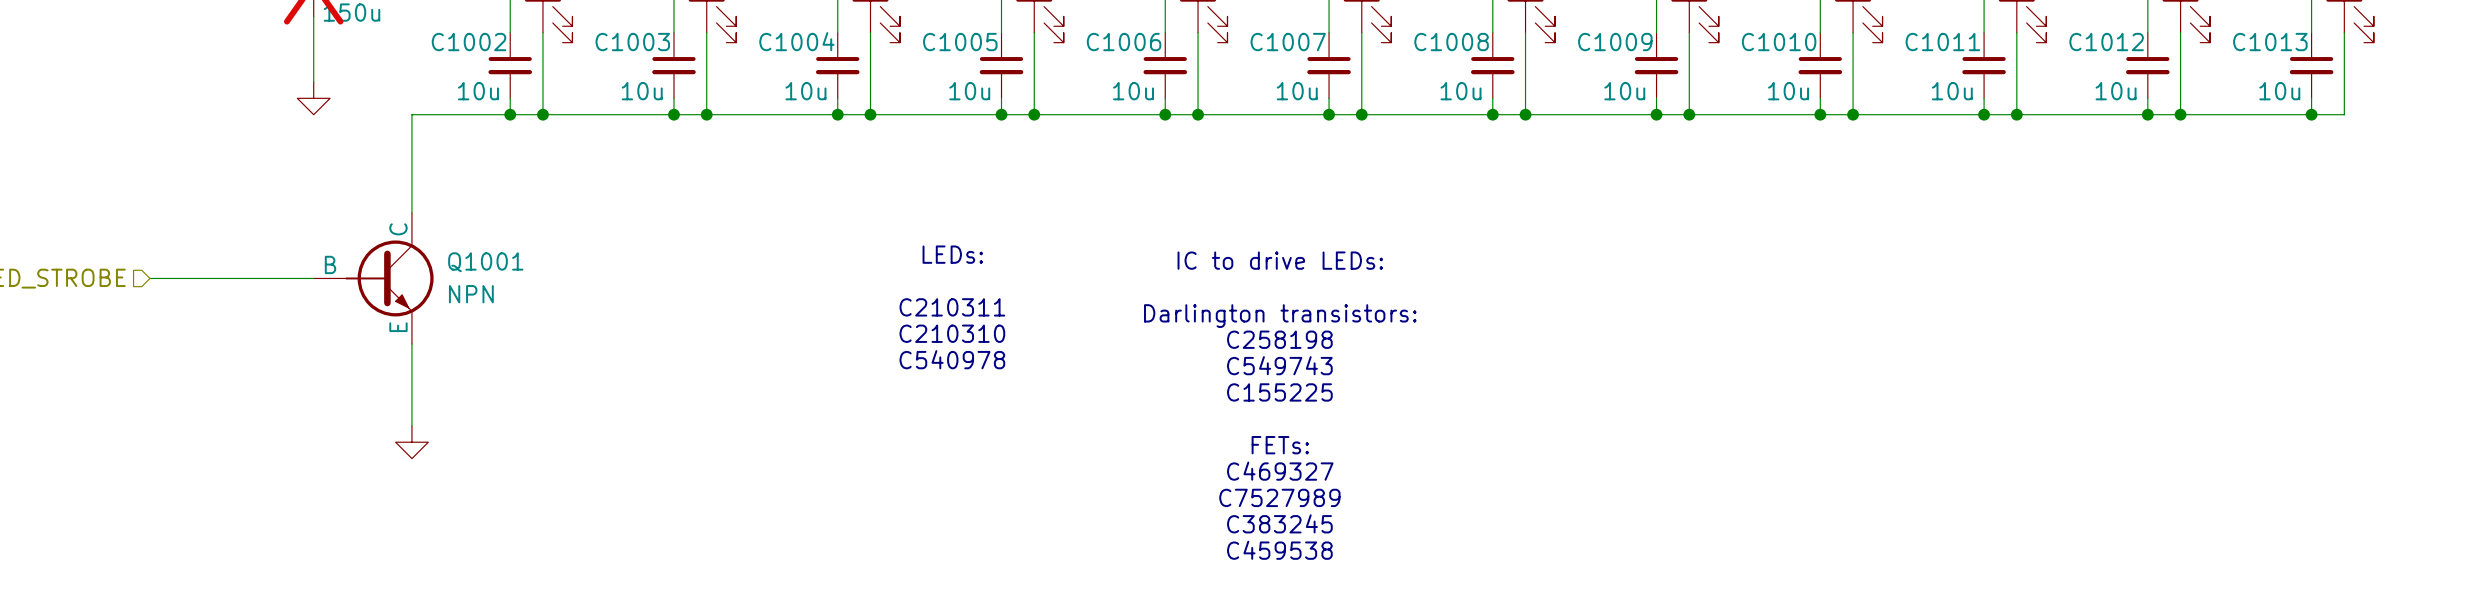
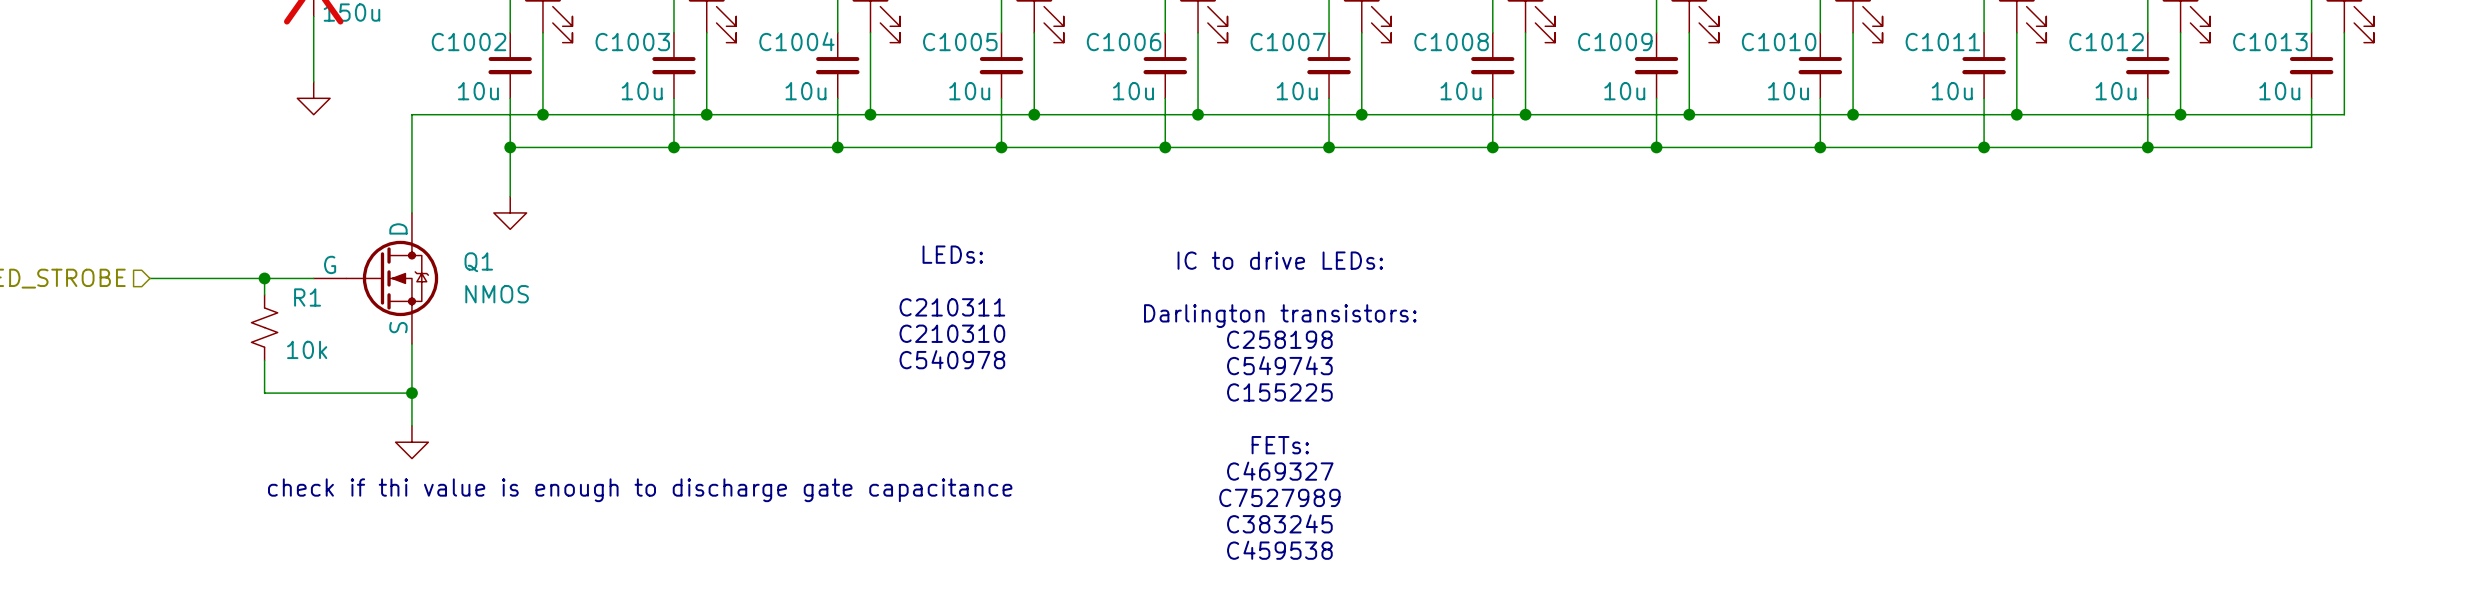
wire: none -> (510, 114) (510, 196)
junction position: (510, 114) -> (510, 147)
wire: none -> (673, 114) (673, 147)
junction position: (673, 114) -> (673, 147)
wire: none -> (837, 114) (837, 147)
junction position: (837, 114) -> (837, 147)
wire: none -> (1001, 114) (1001, 147)
junction position: (1001, 114) -> (1001, 147)
wire: none -> (1165, 114) (1165, 147)
junction position: (1165, 114) -> (1165, 147)
wire: none -> (1329, 114) (1329, 147)
junction position: (1329, 114) -> (1329, 147)
wire: none -> (1492, 114) (1492, 147)
junction position: (1492, 114) -> (1492, 147)
wire: none -> (1656, 114) (1656, 147)
junction position: (1656, 114) -> (1656, 147)
wire: none -> (1820, 114) (1820, 147)
junction position: (1820, 114) -> (1820, 147)
wire: none -> (1984, 114) (1984, 147)
junction position: (1984, 114) -> (1984, 147)
wire: none -> (2147, 114) (2147, 147)
junction position: (2147, 114) -> (2147, 147)
wire: none -> (2311, 114) (2311, 147) (510, 147)
junction: (2311, 114) -> none
power symbol: none -> (510, 212)
wire: none -> (264, 278) (264, 294)
junction: none -> (264, 278)
Q1001: NPN (373, 278) -> none
Q1: none -> NMOS (375, 278)
R1: none -> 10k (264, 327)
wire: none -> (264, 360) (264, 393) (411, 393)
junction: none -> (411, 393)
text: none -> check if thi value is enough to discharge gate capacitance (640, 490)

